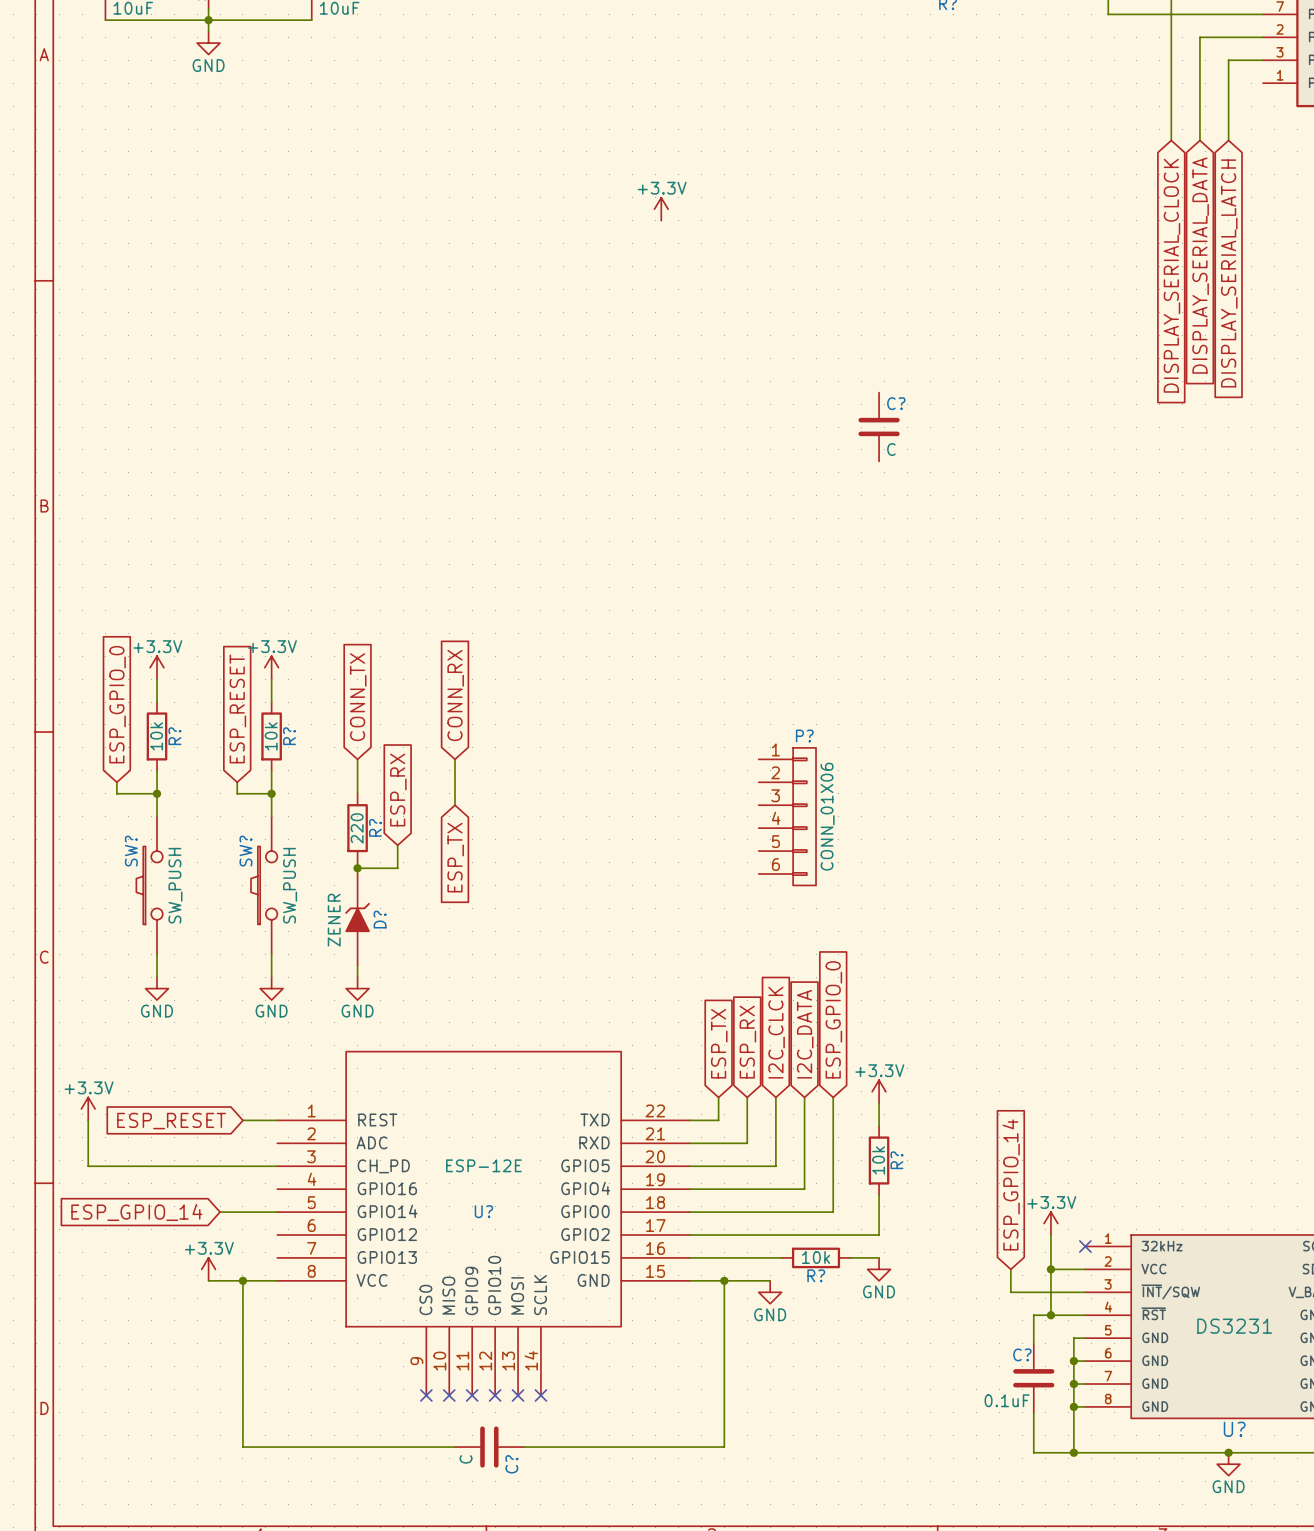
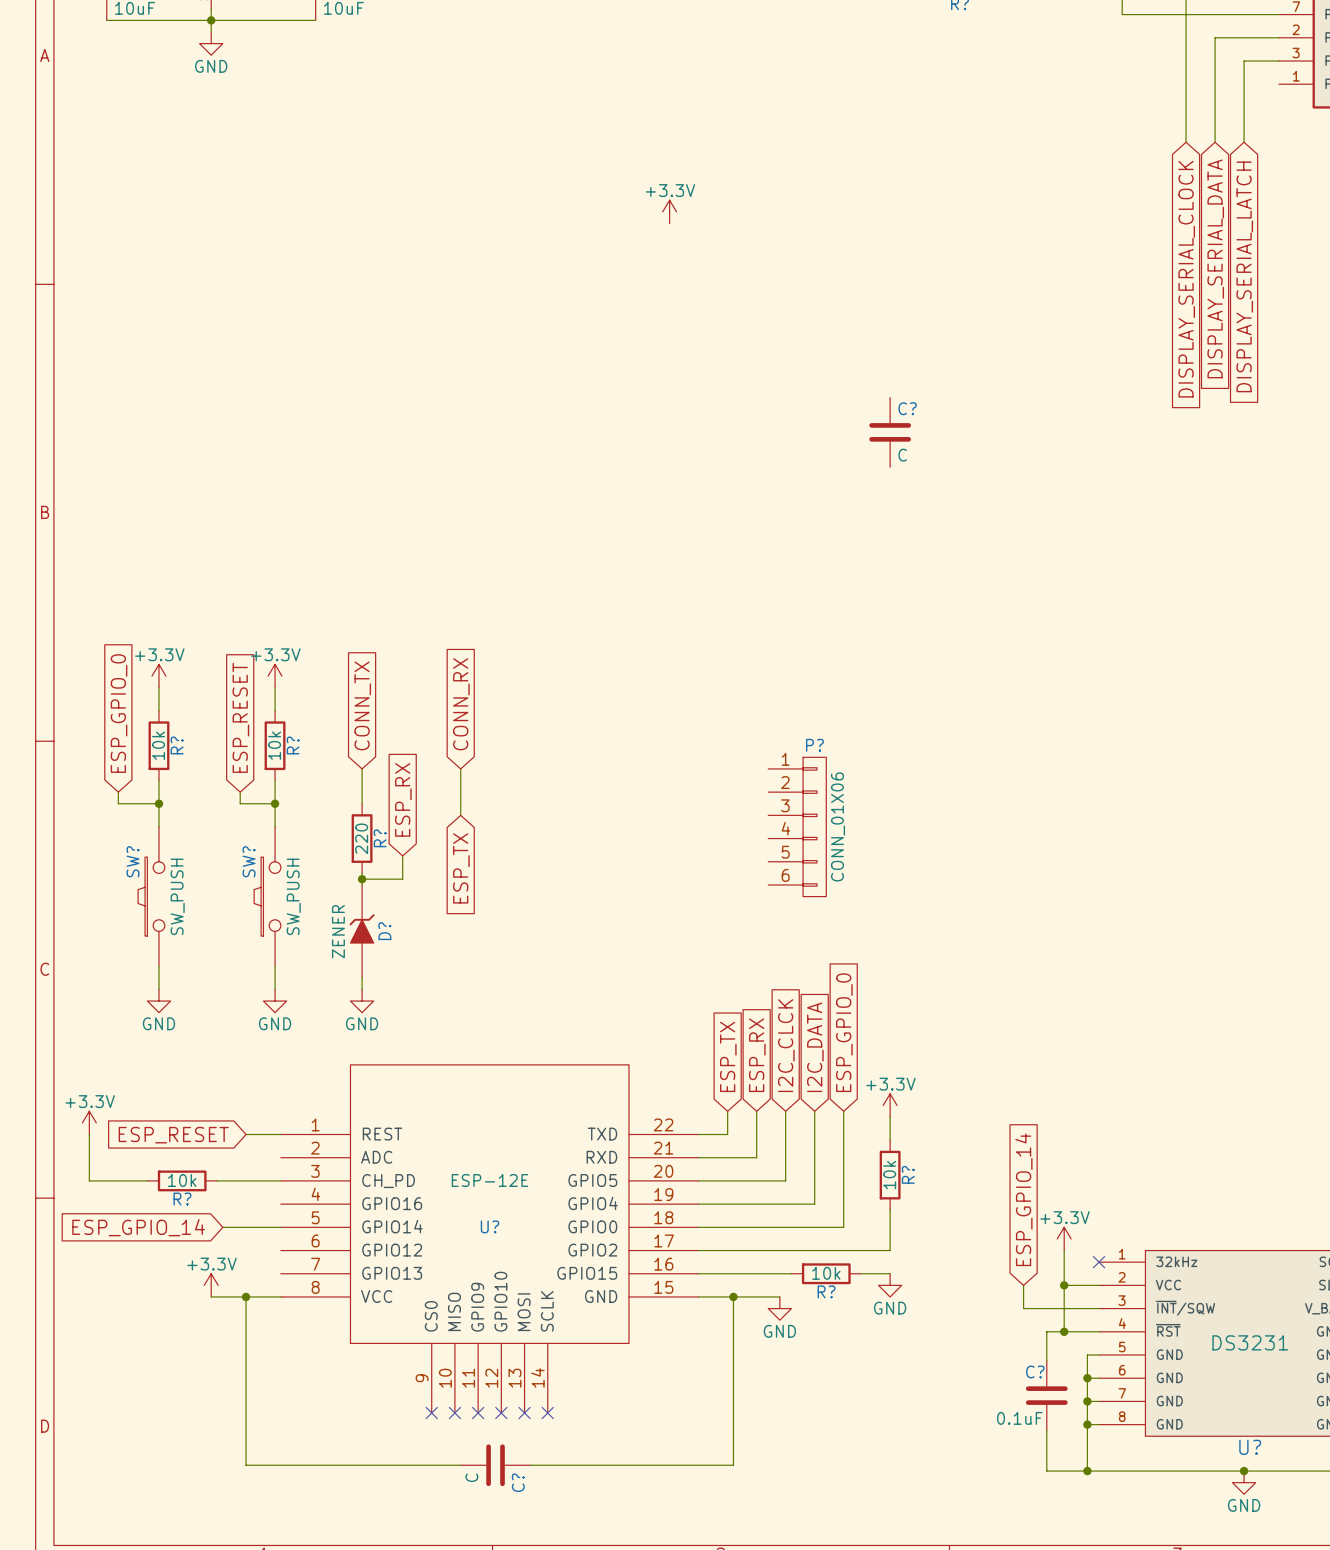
wire: (145, 1166) (214, 1166) -> none
R?: none -> 10k (182, 1180)

